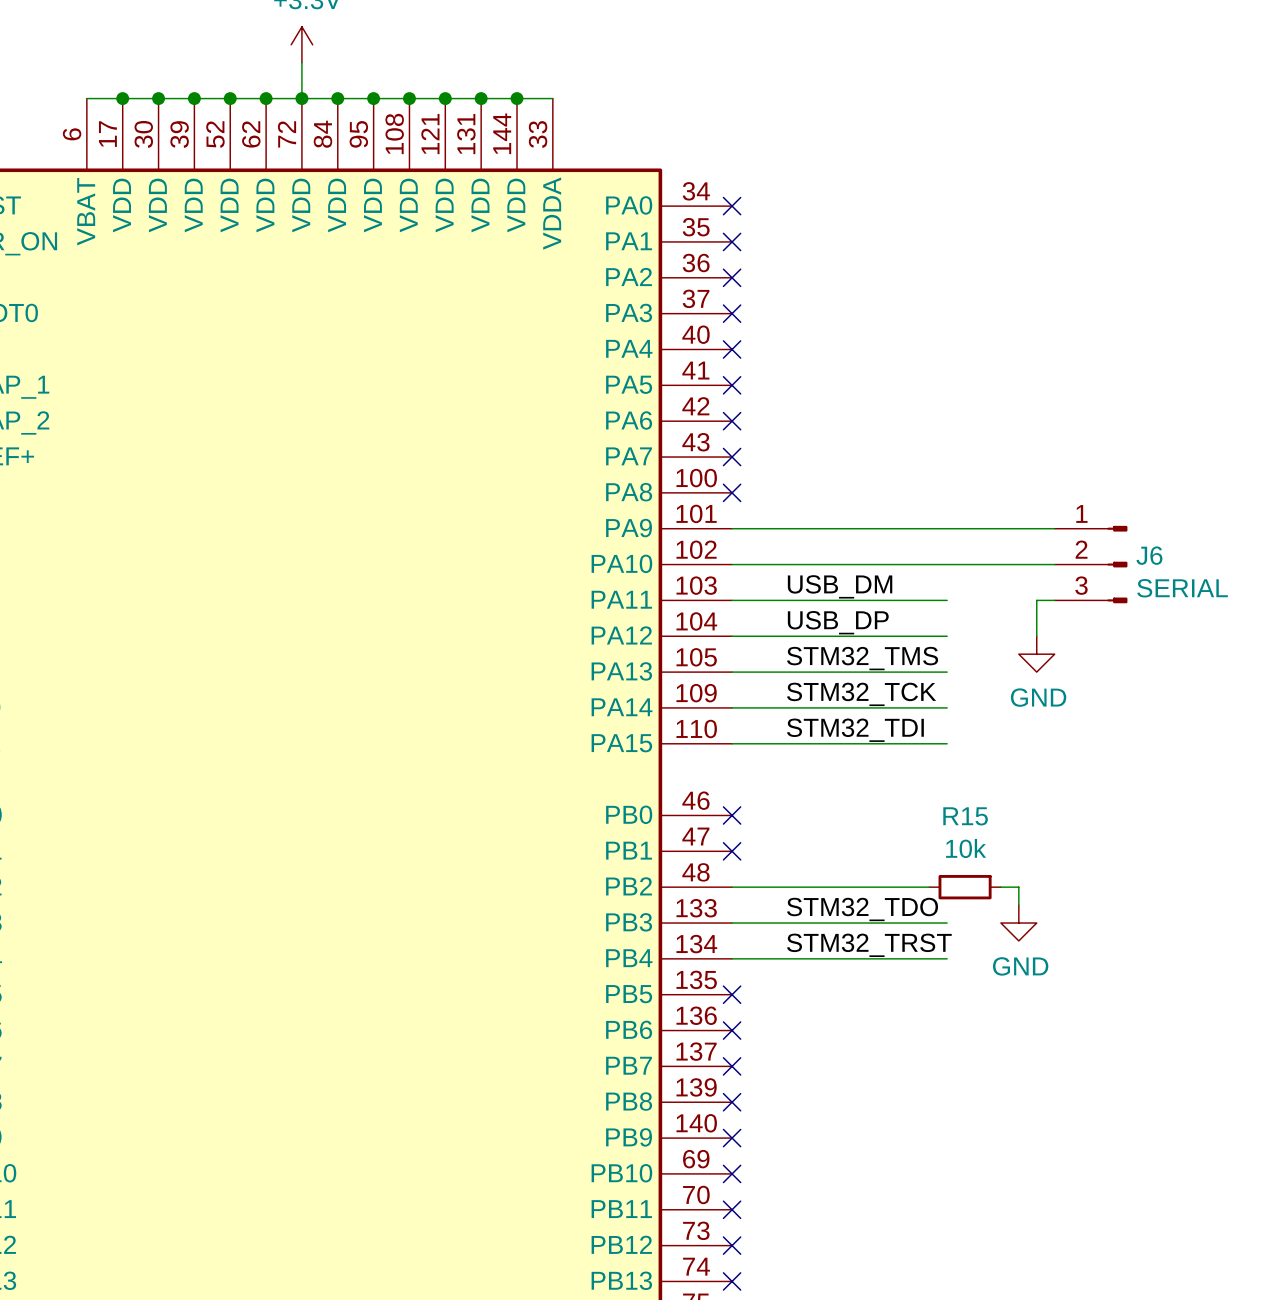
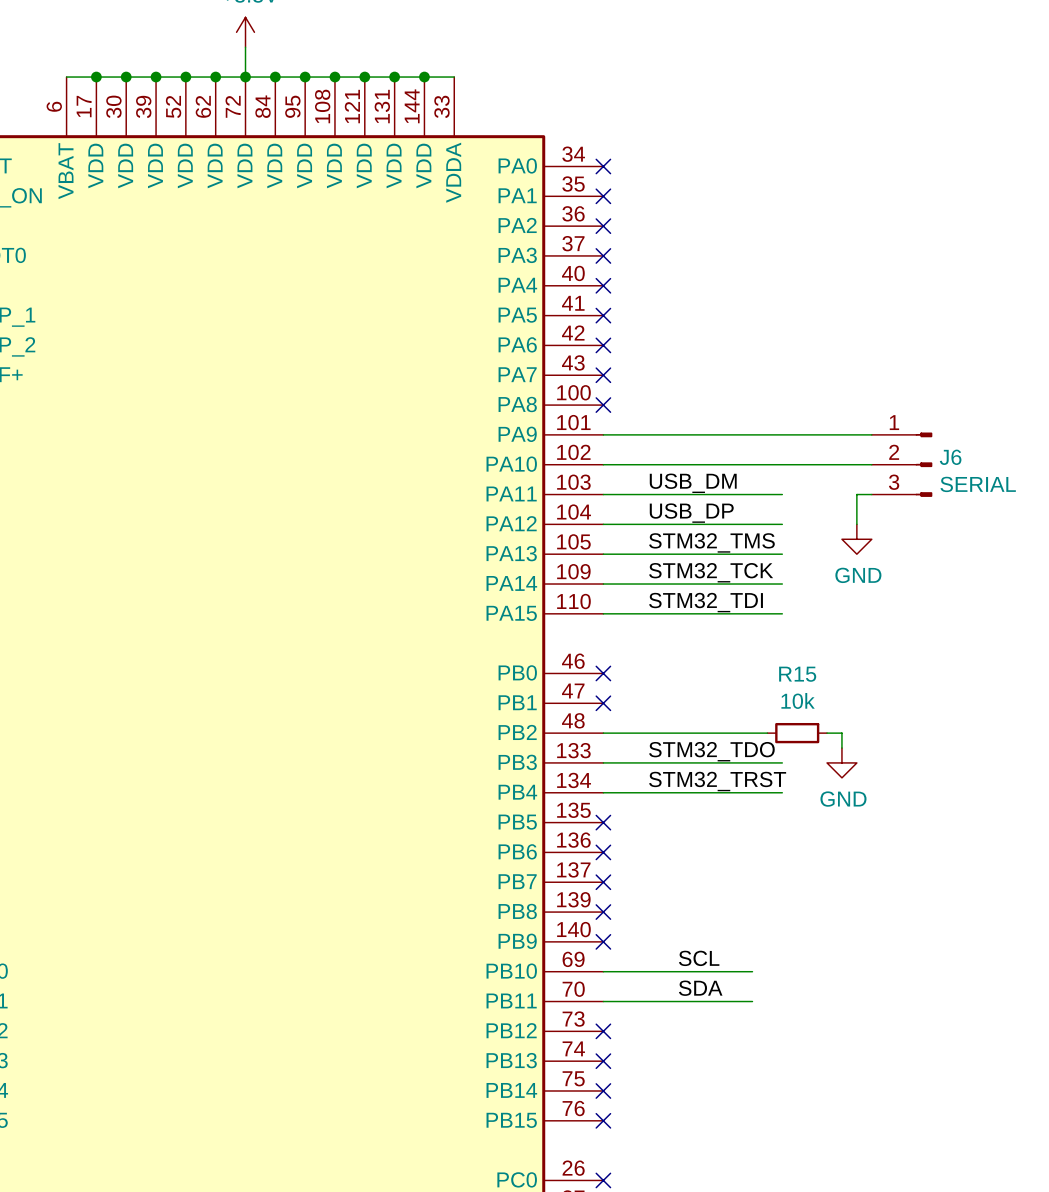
label: none -> SCL (699, 958)
wire: none -> (603, 971) (752, 971)
no-connect mark: (732, 1173) -> none
label: none -> SDA (700, 988)
wire: none -> (603, 1001) (752, 1001)
no-connect mark: (732, 1209) -> none

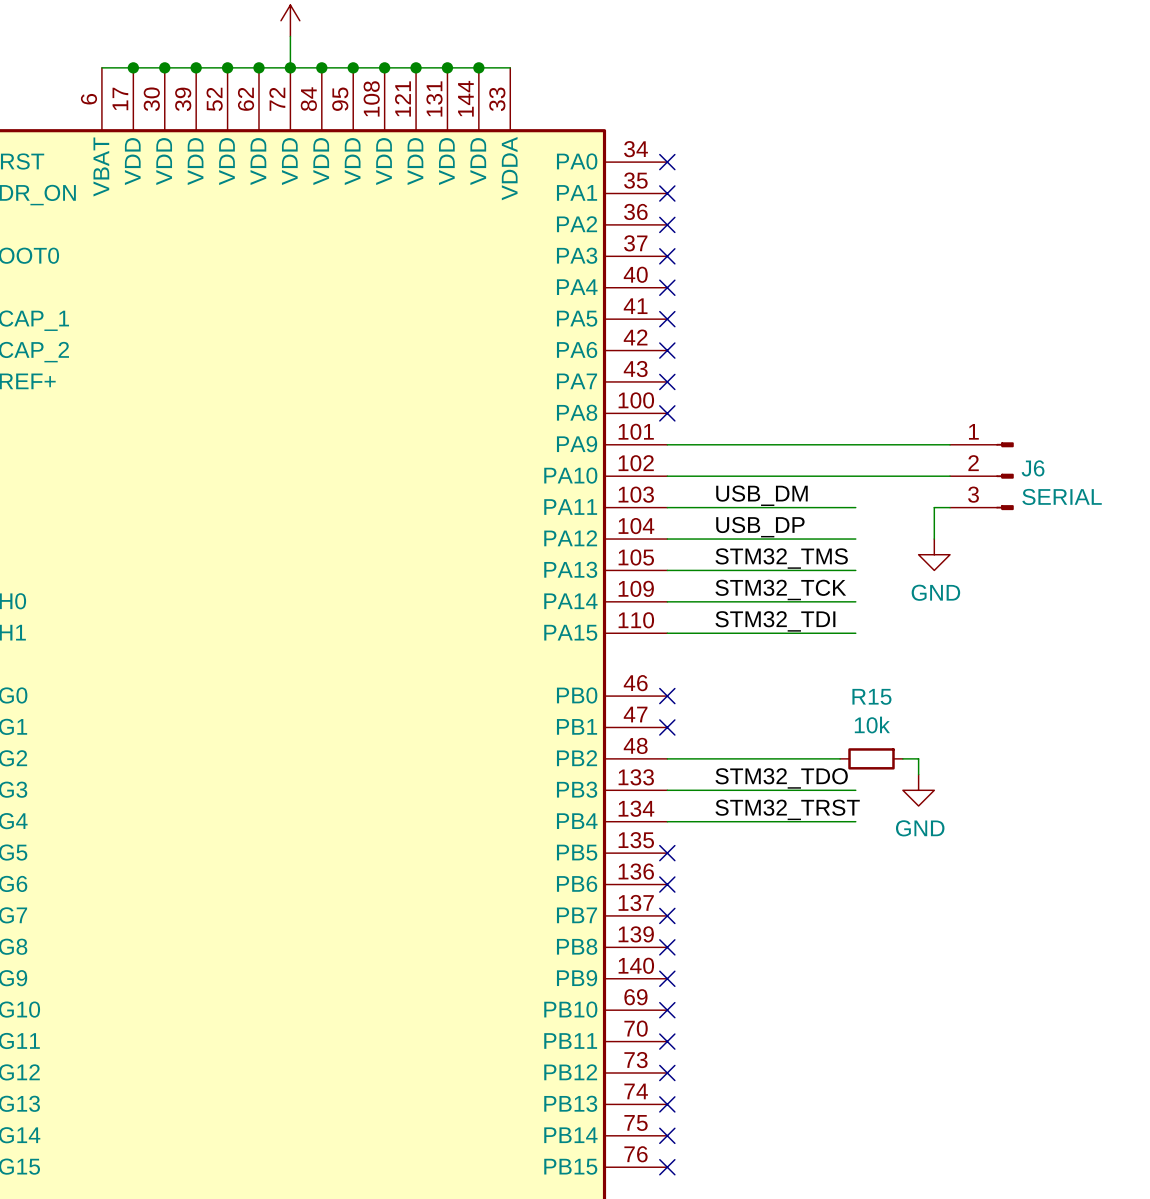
label: SCL (699, 958) -> none
wire: (603, 971) (752, 971) -> none
no-connect mark: none -> (667, 1010)
label: SDA (700, 988) -> none
wire: (603, 1001) (752, 1001) -> none
no-connect mark: none -> (667, 1041)

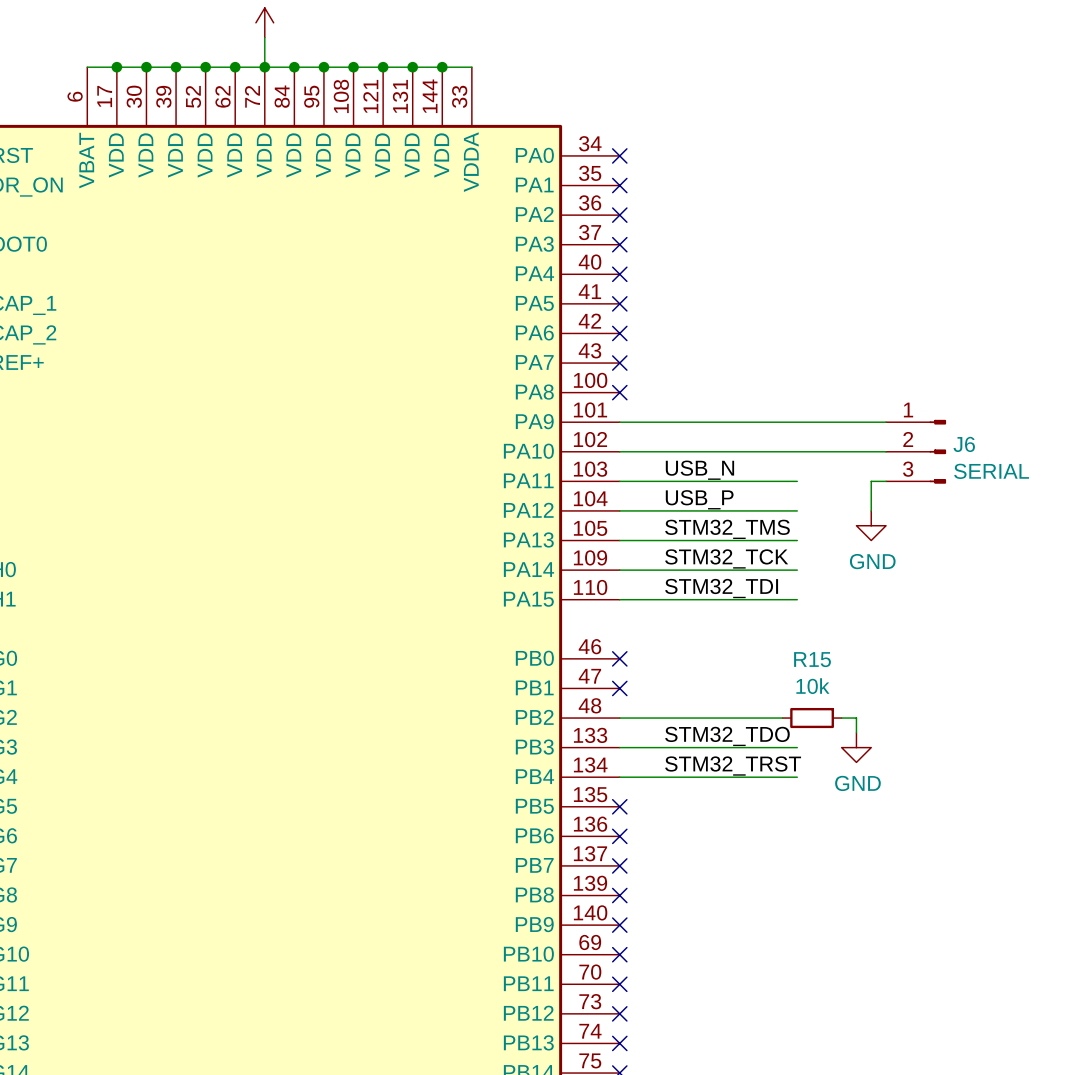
label: USB_DM (761, 495) -> USB_N (699, 470)
label: USB_DP (760, 527) -> USB_P (699, 499)

